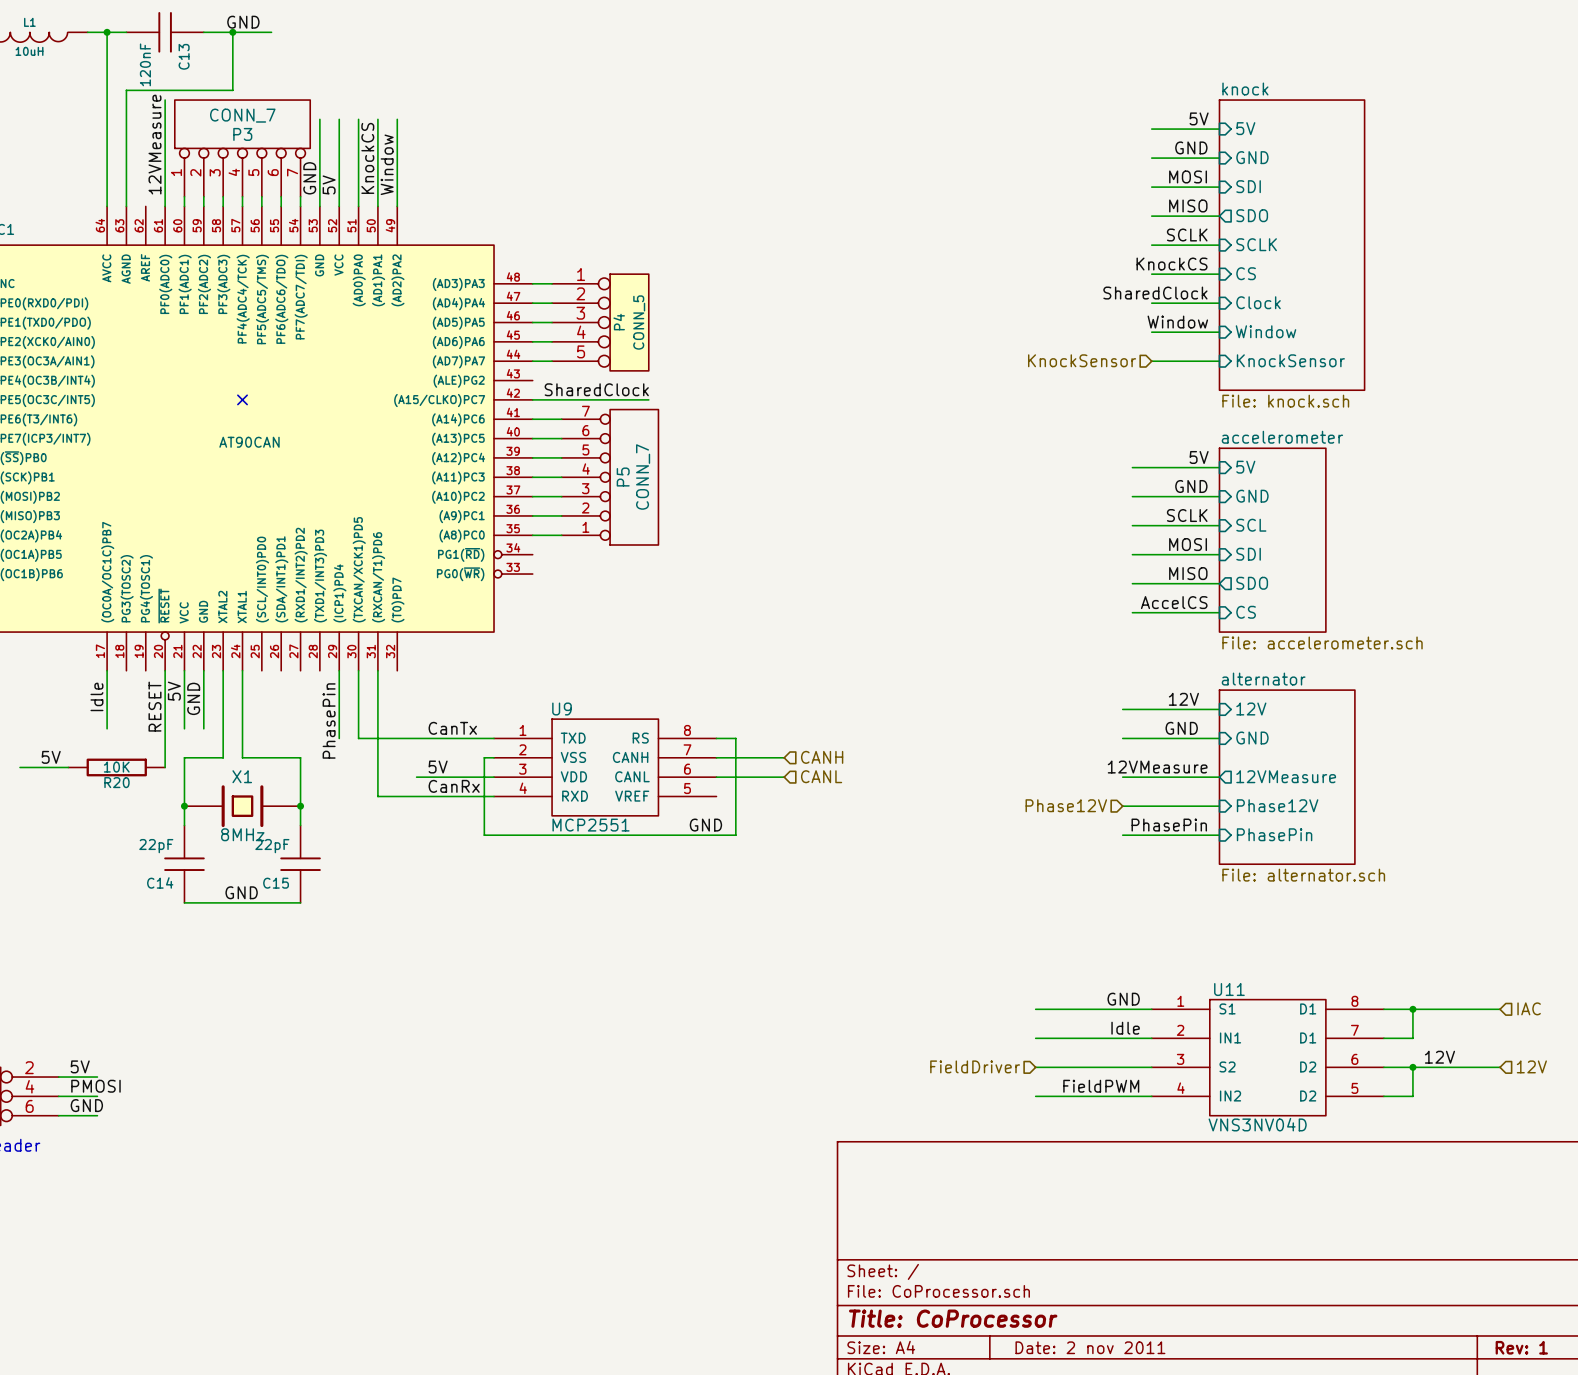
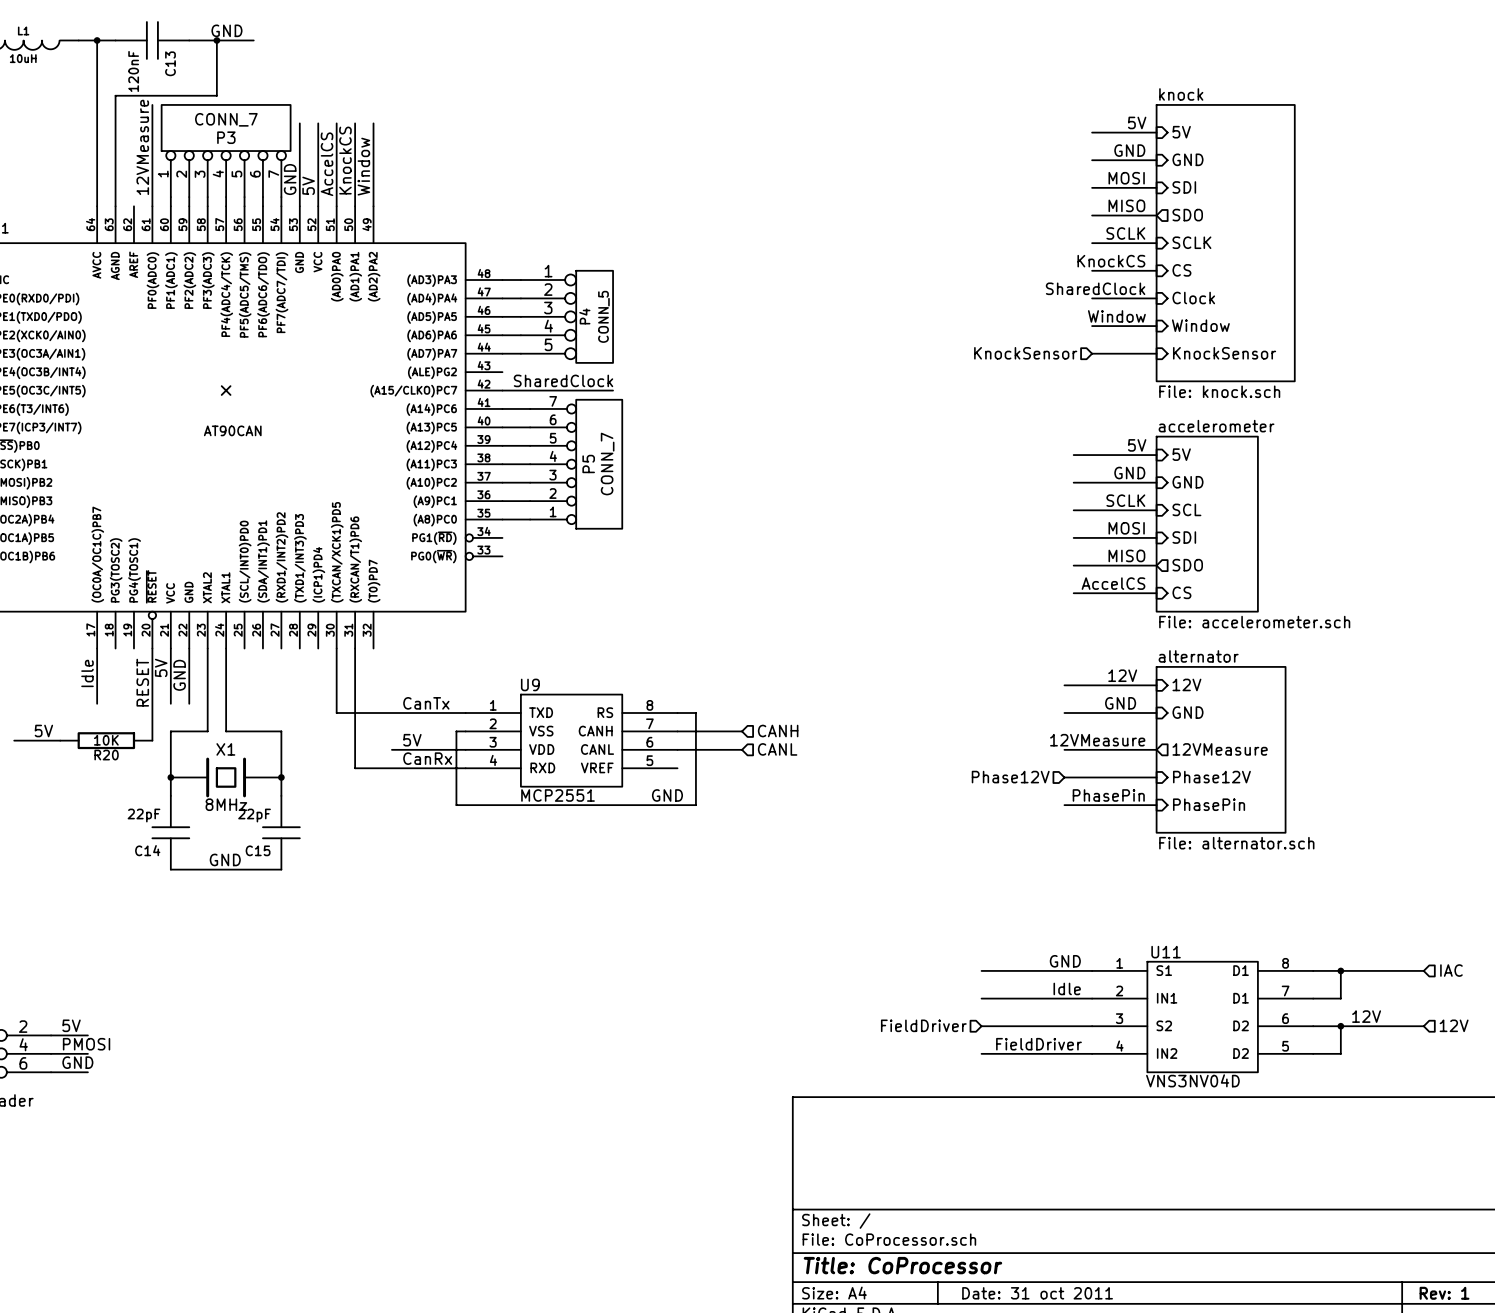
label: none -> AccelCS (327, 164)
wire: (339, 670) (339, 738) -> none
label: PhasePin (329, 720) -> none
label: FieldPWM (1101, 1086) -> FieldDriver (1039, 1044)
title block: Date: 2 nov 2011 (1090, 1347) -> Date: 31 oct 2011 (1037, 1293)

